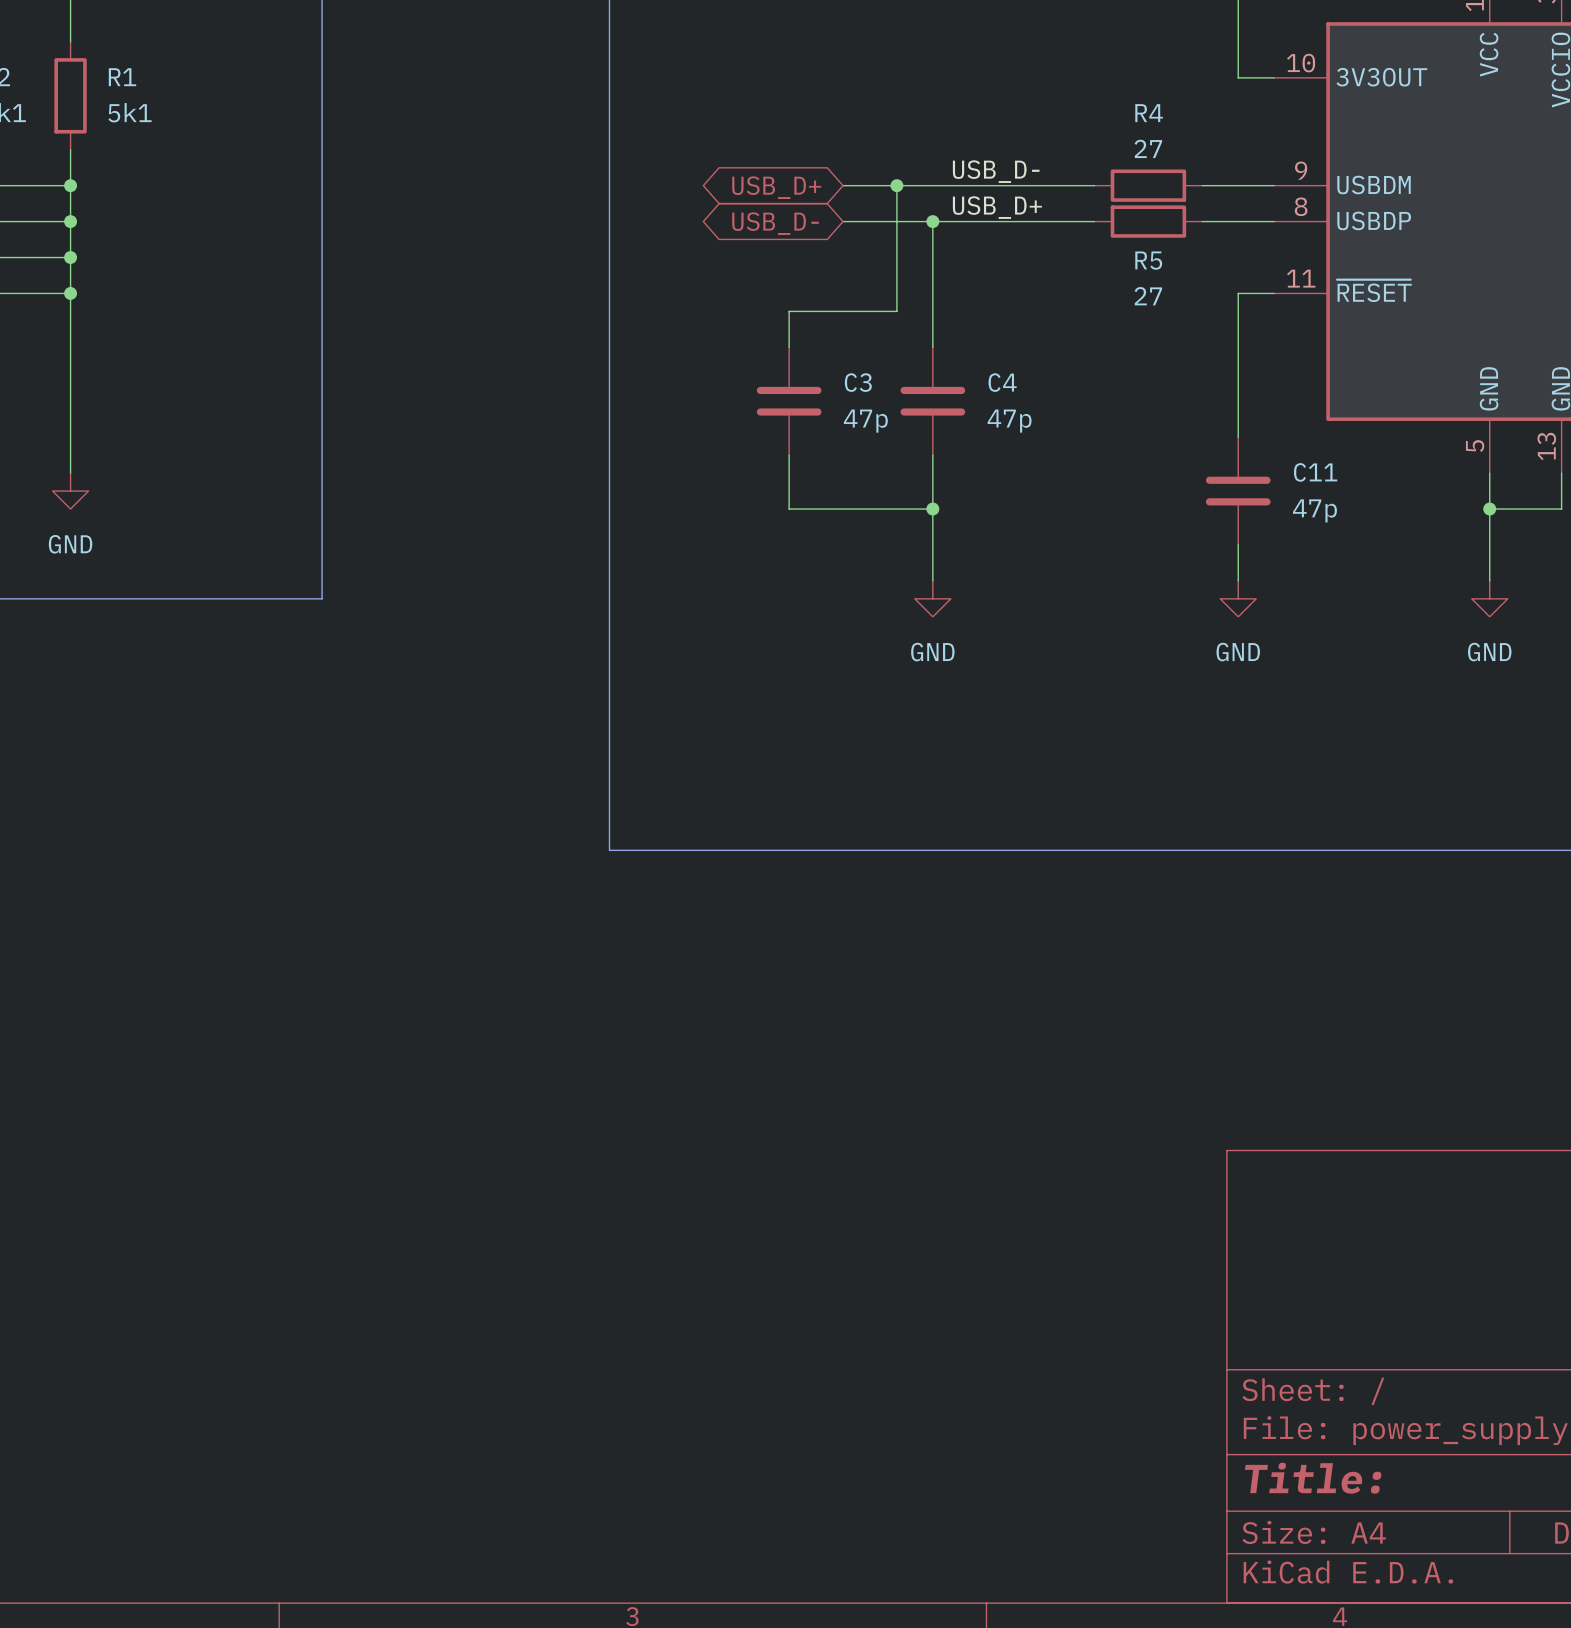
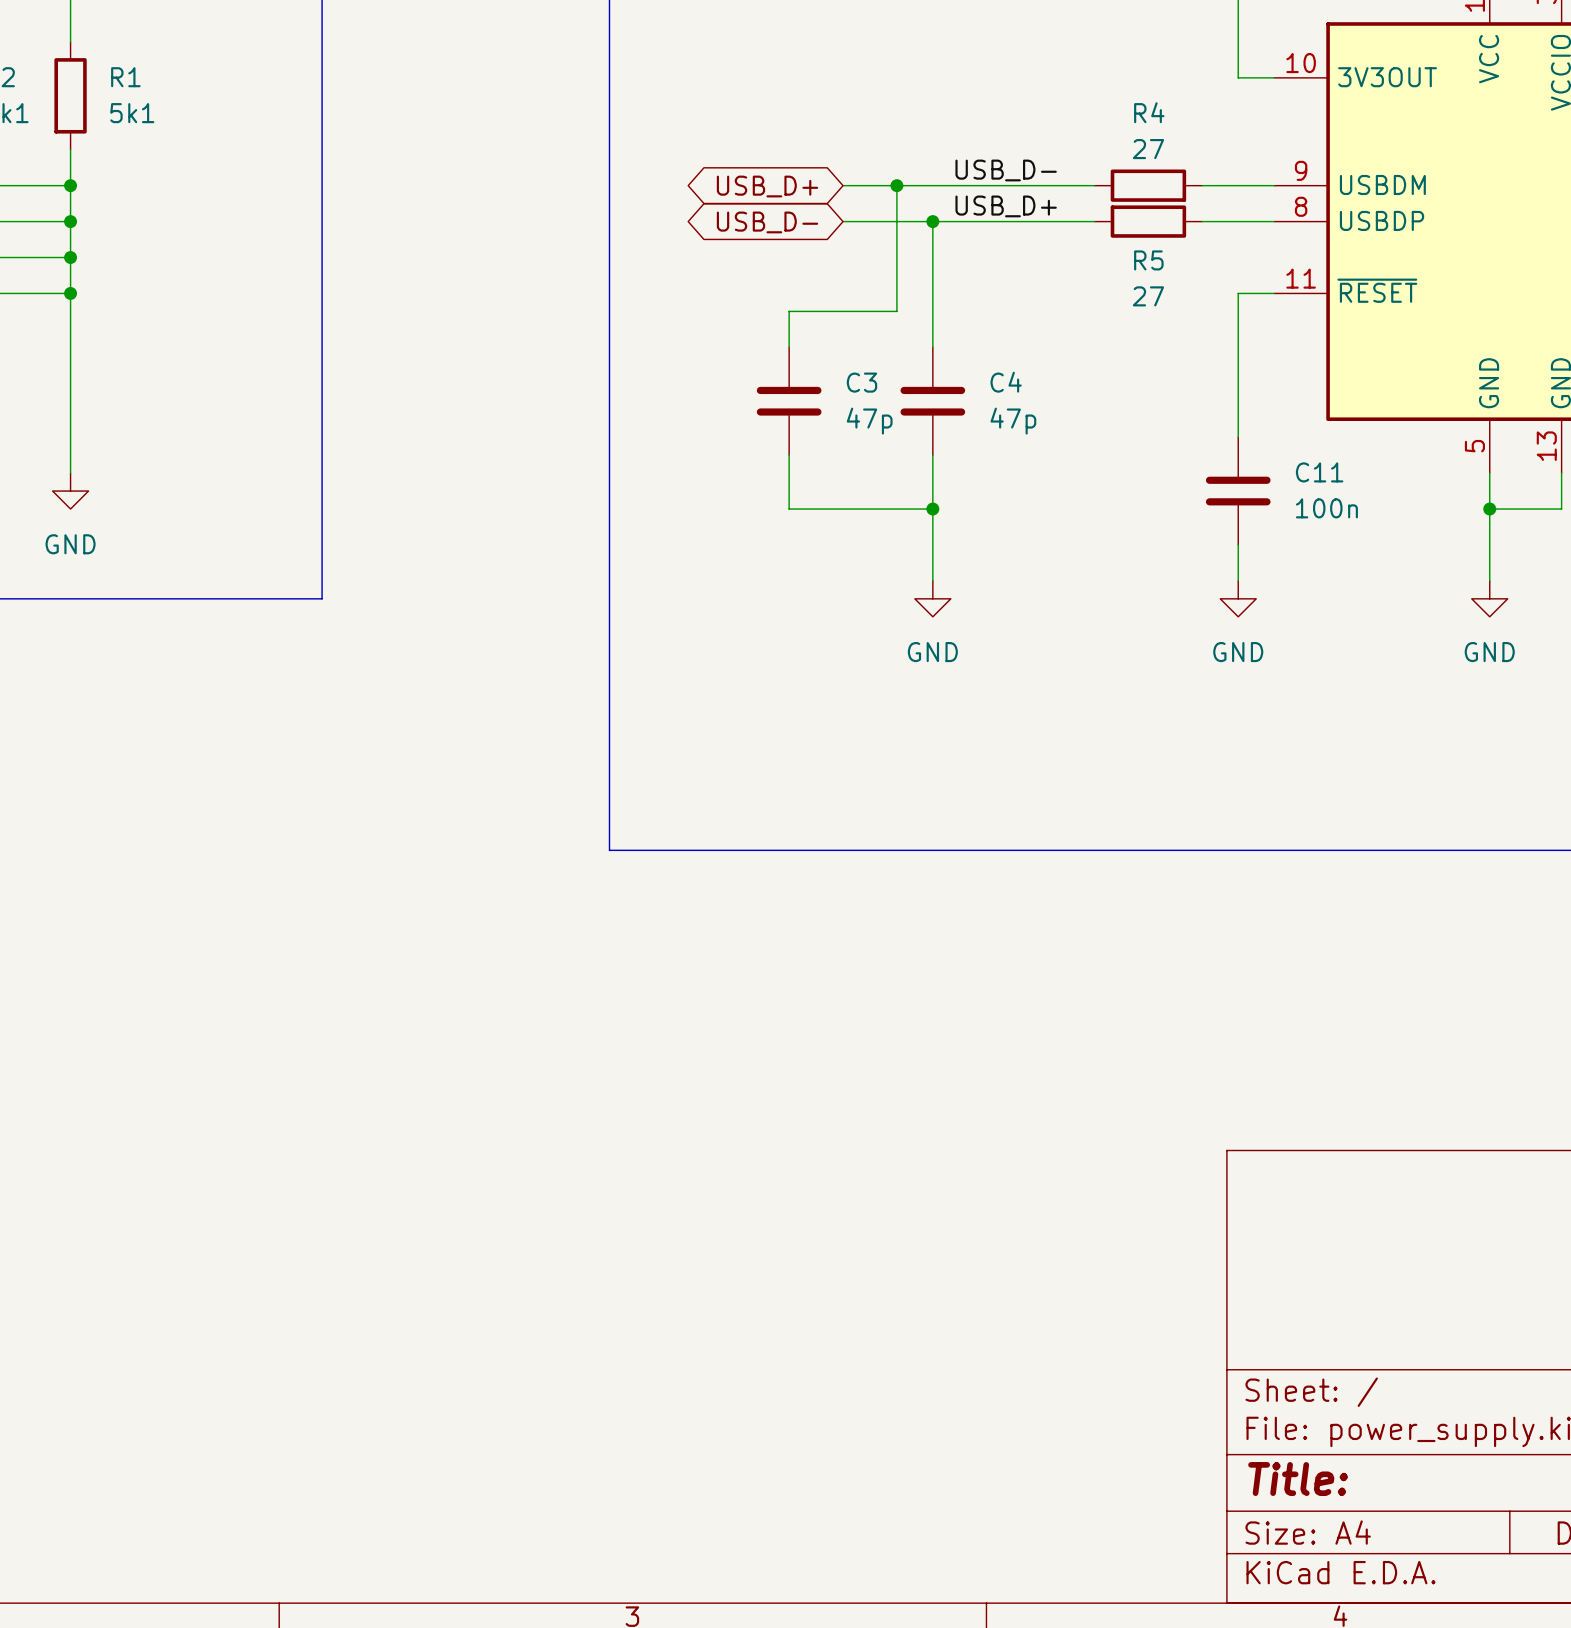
C11 value: 47p (1314, 510) -> 100n (1326, 508)

